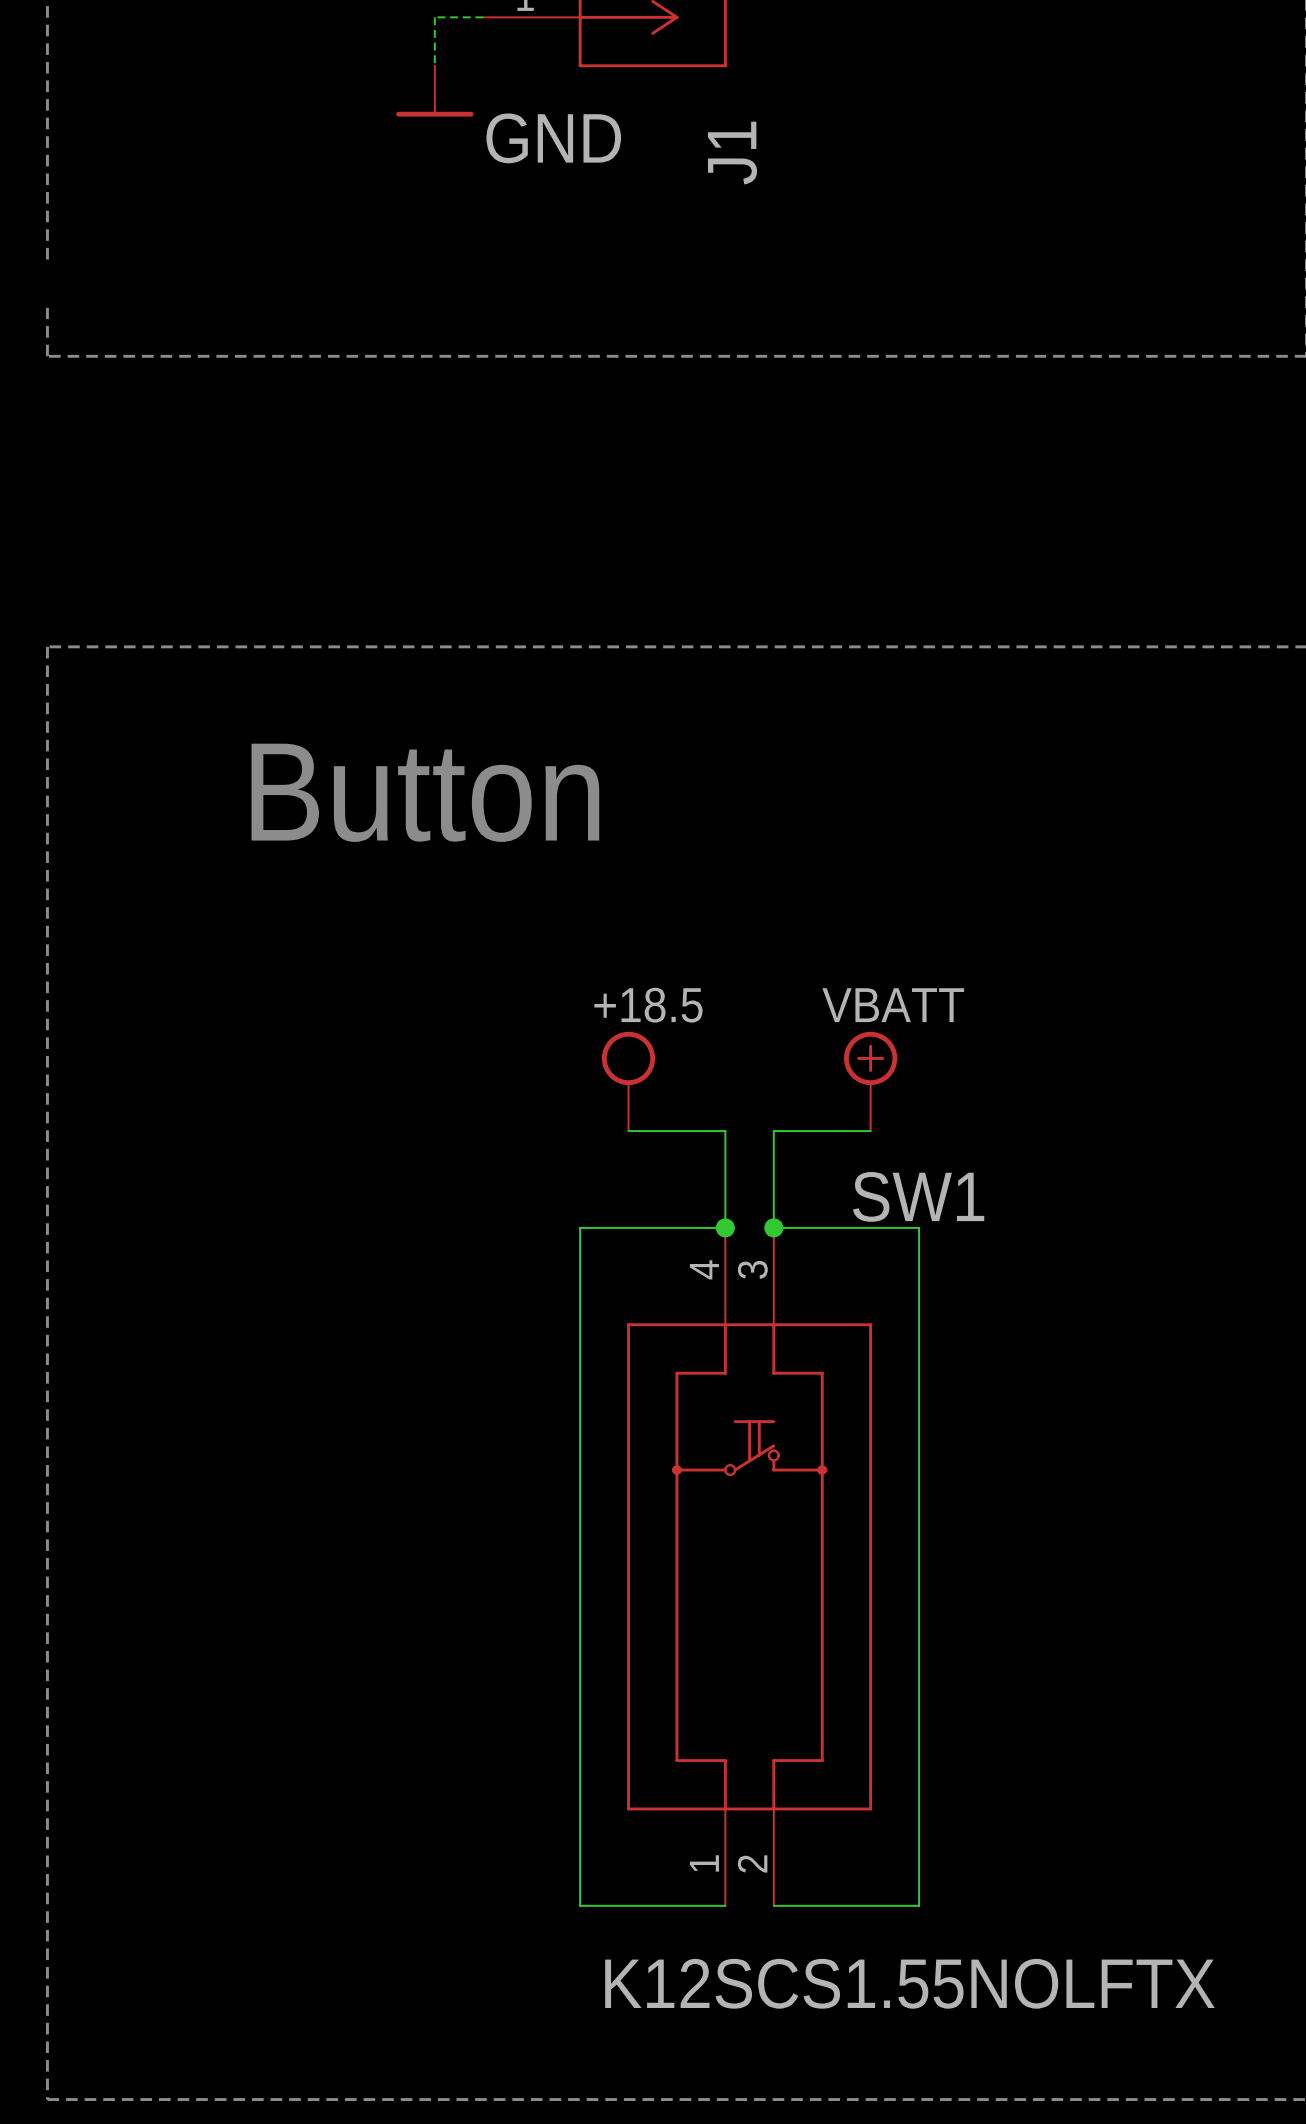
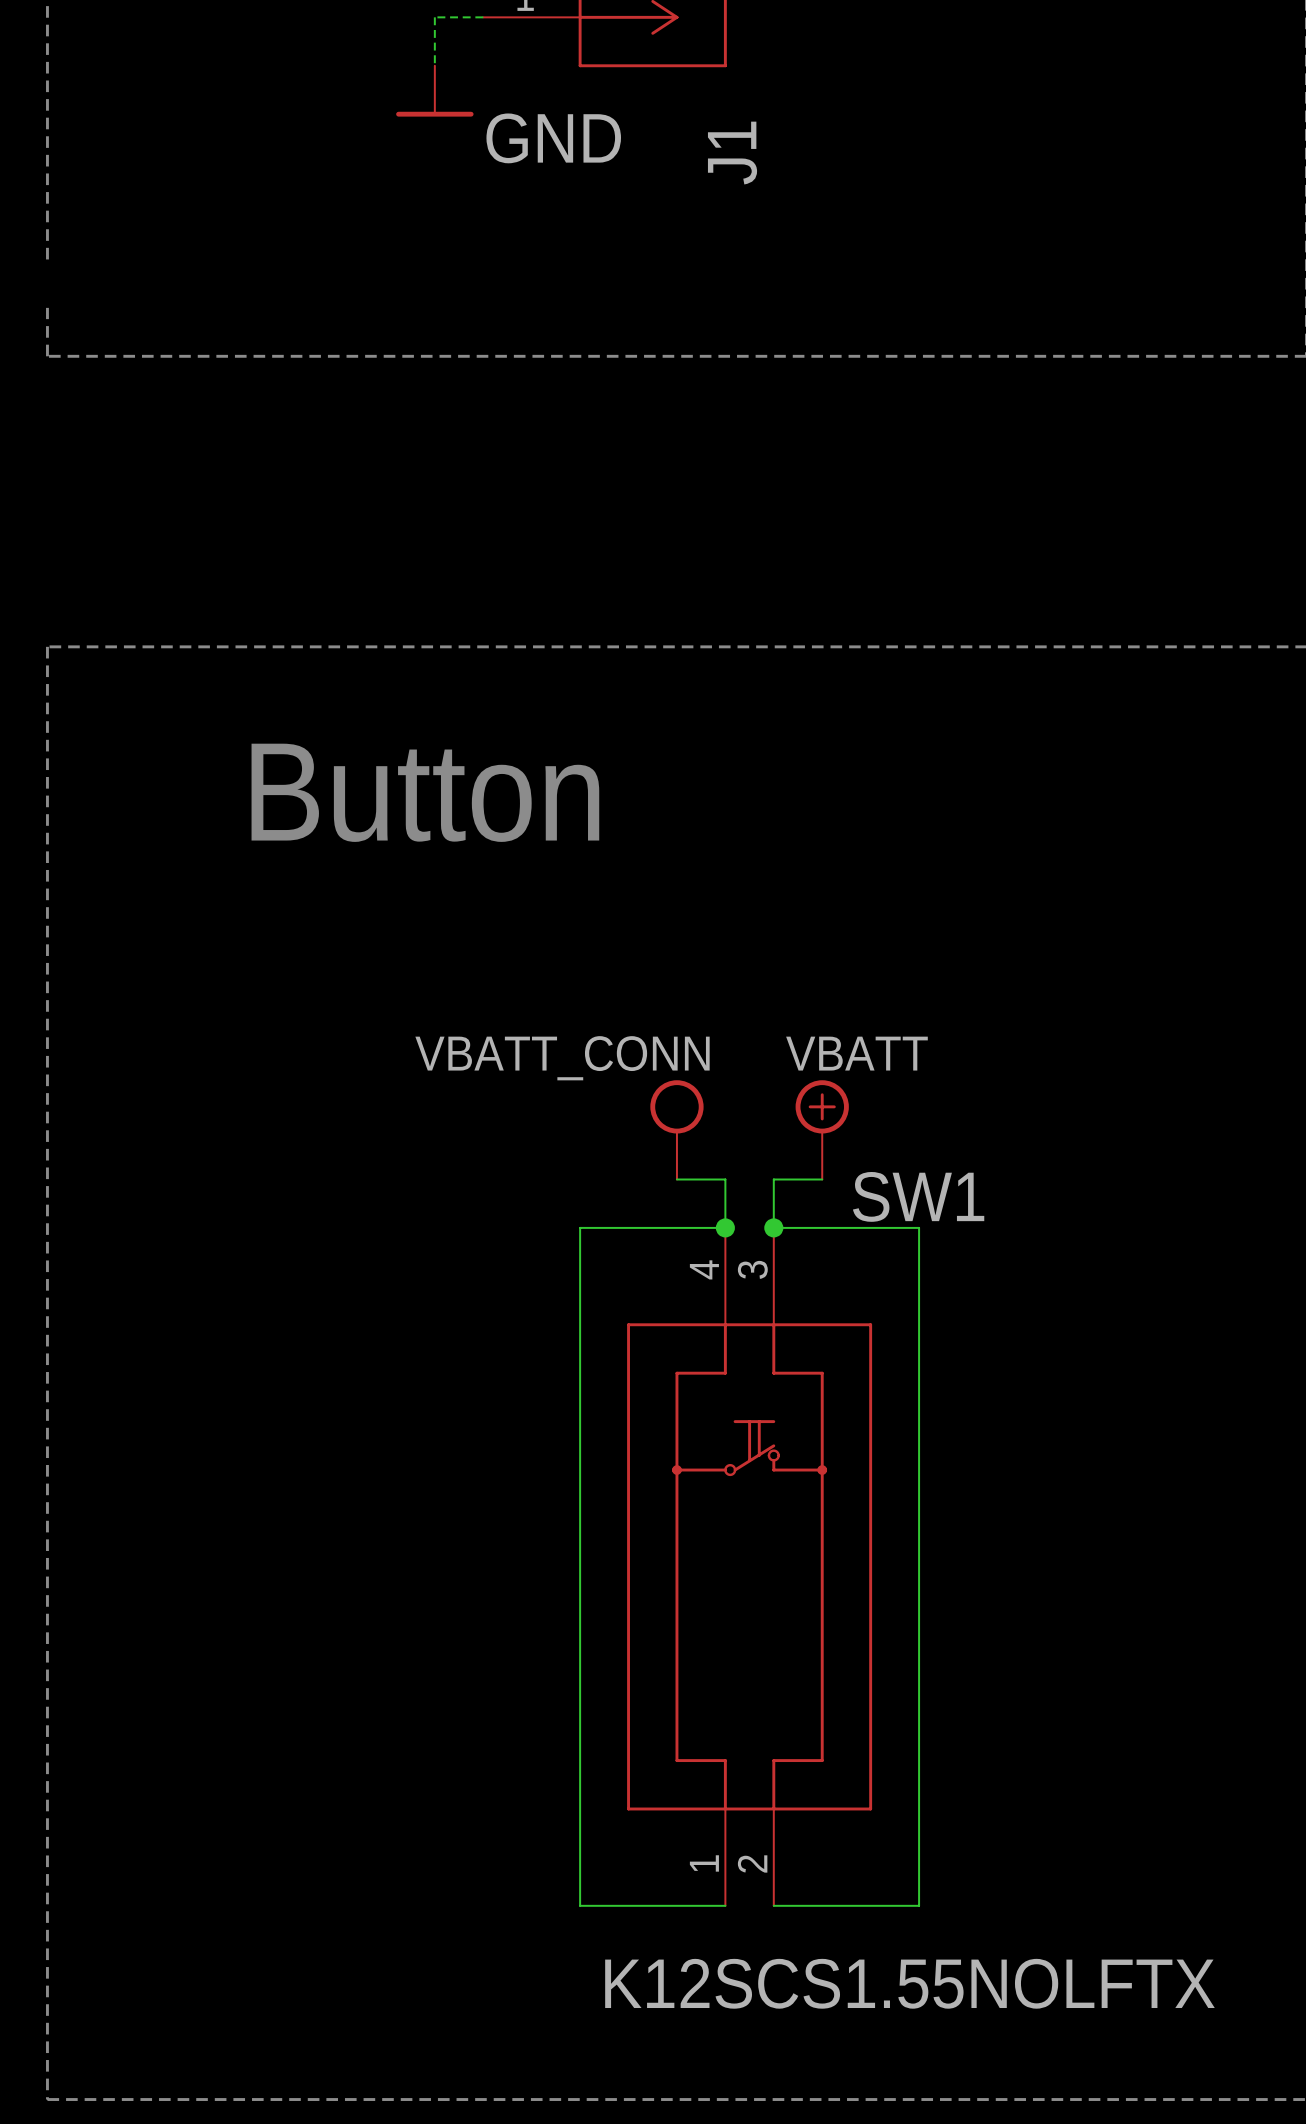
power symbol text position: VBATT (893, 1005) -> VBATT (856, 1053)
power symbol: +18.5 (628, 1081) -> none
power symbol position: VBATT (870, 1081) -> VBATT (822, 1129)
power symbol: none -> VBATT_CONN (676, 1129)
wire: (628, 1131) (725, 1131) (725, 1179) -> (676, 1179) (725, 1179)
wire: (870, 1131) (773, 1131) (773, 1179) -> (822, 1179) (773, 1179)

